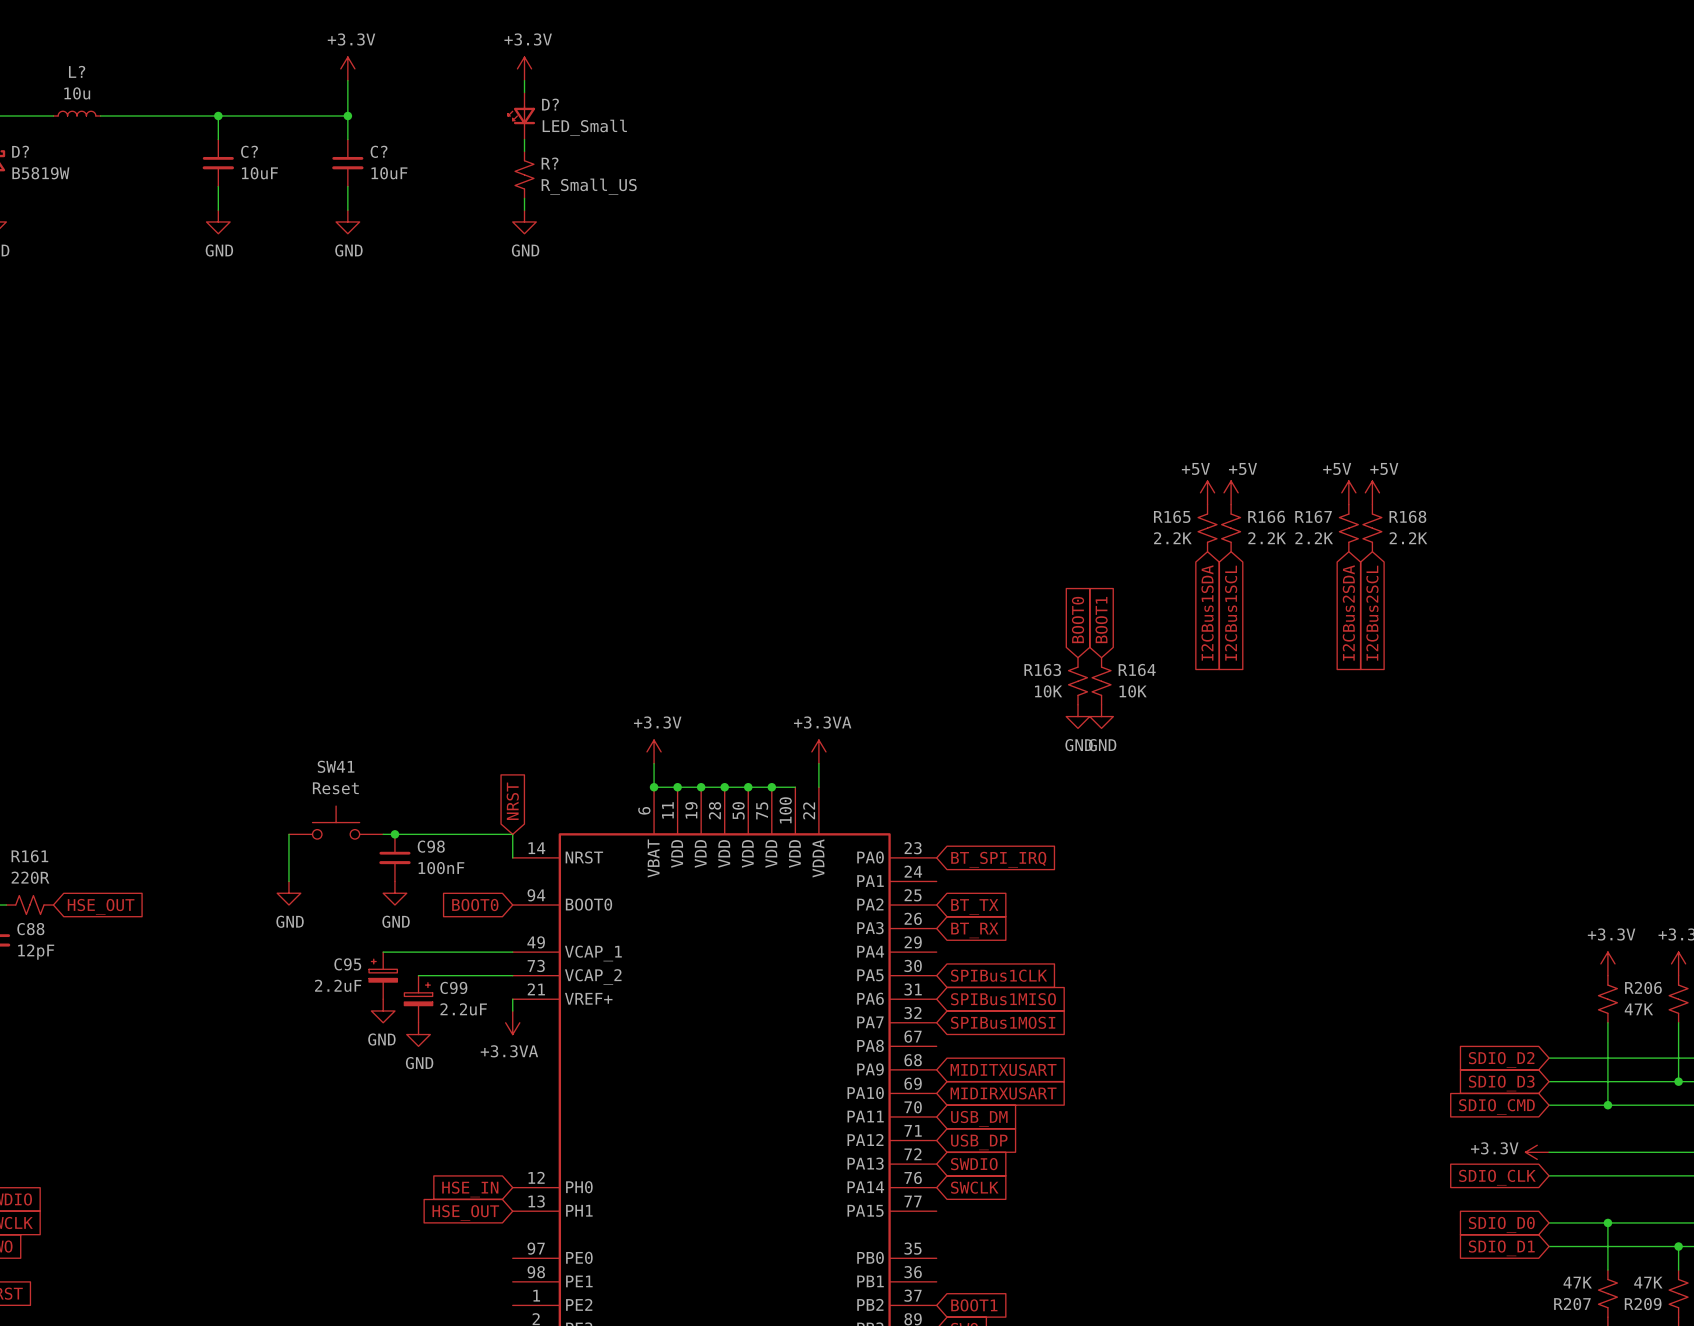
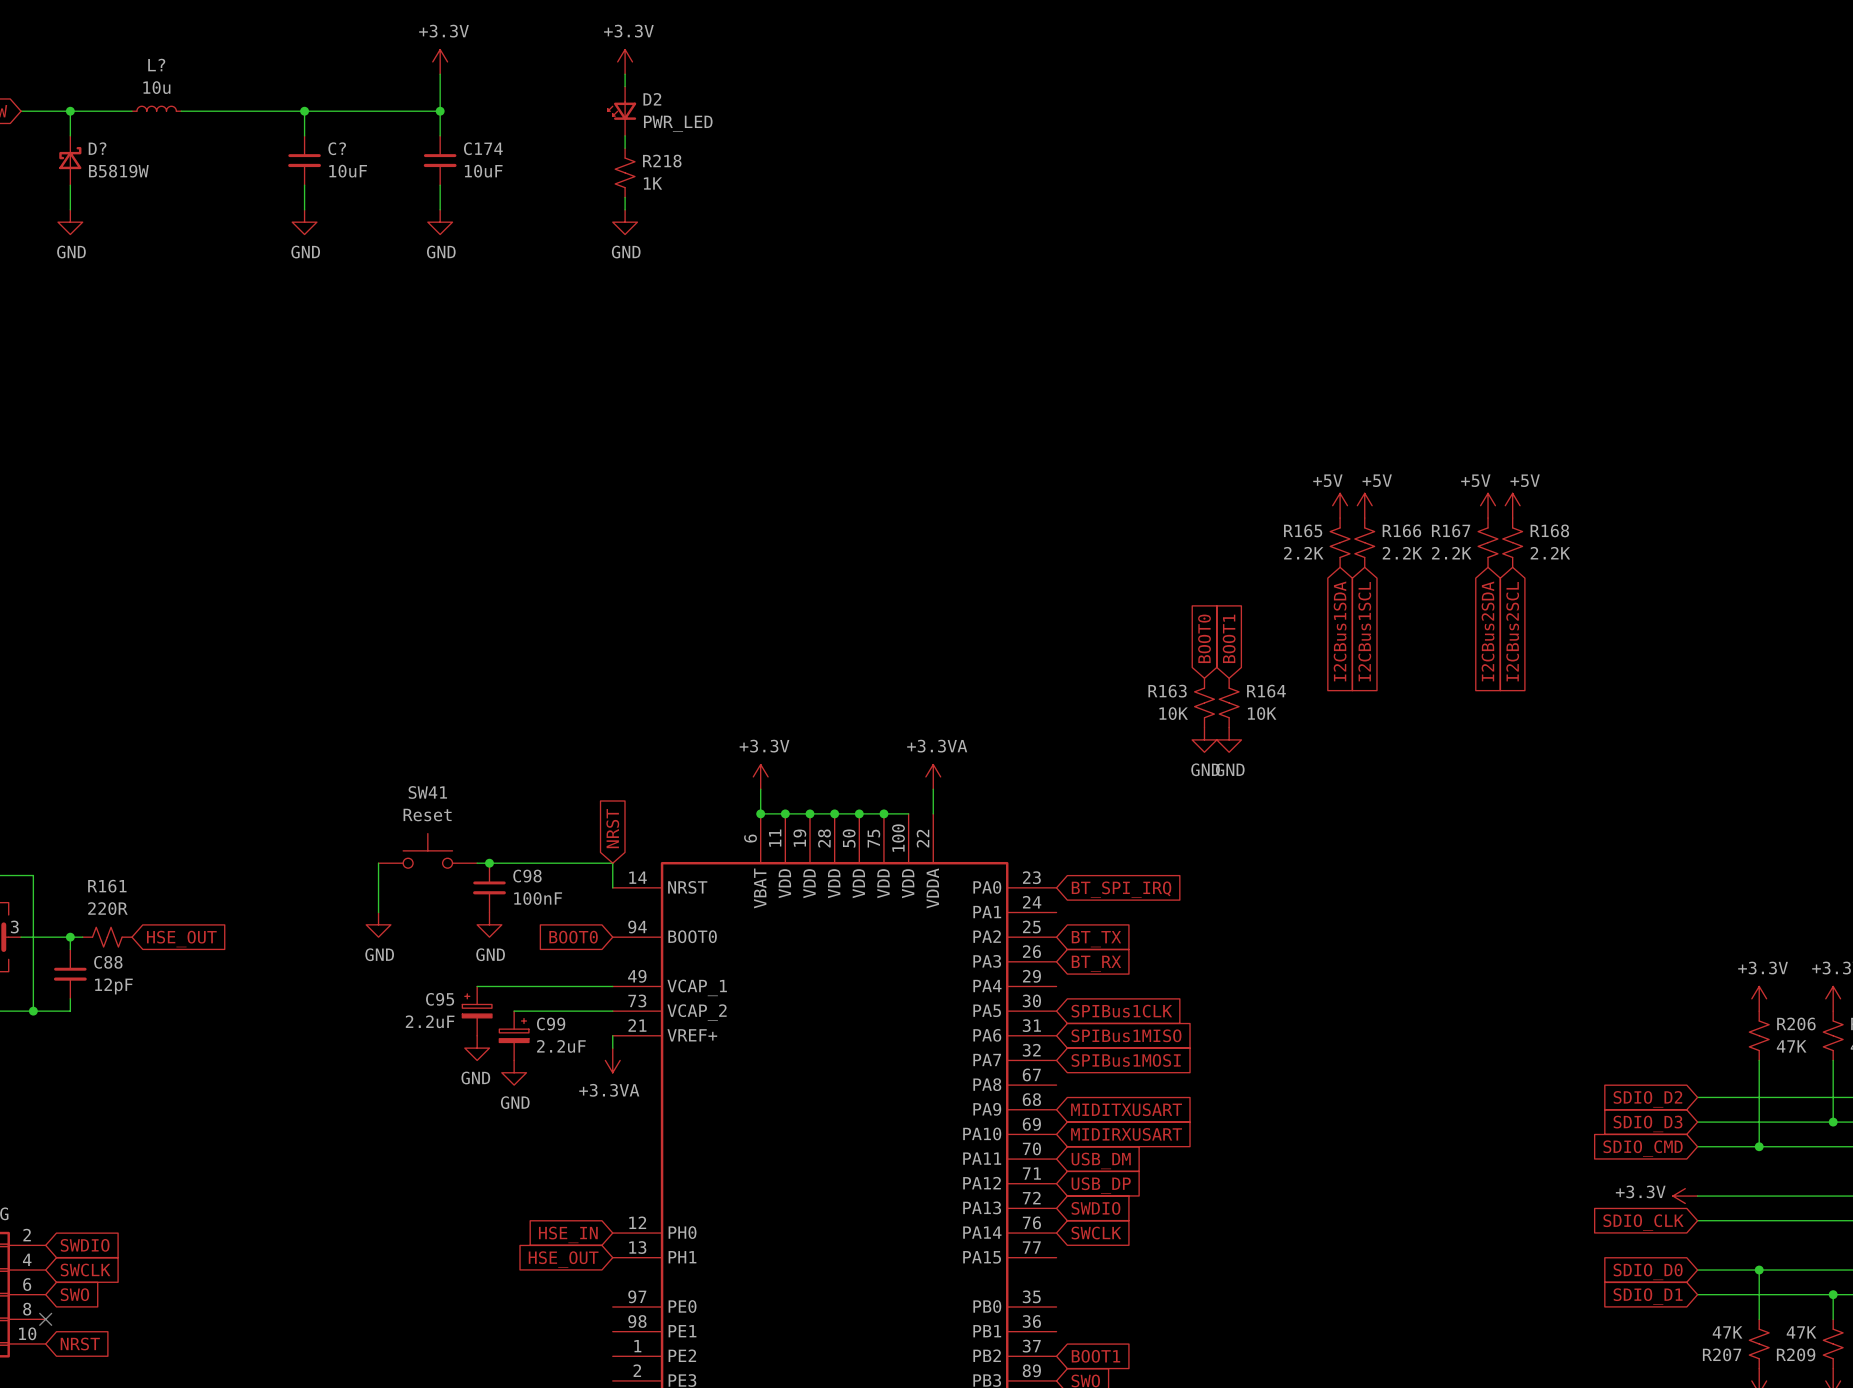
D? name: D? (550, 104) -> D2 (652, 99)
D? value: LED_Small (584, 127) -> PWR_LED (678, 123)
C? name: C? (379, 151) -> C174 (483, 148)
R? name: R? (550, 163) -> R218 (662, 161)
R? value: R_Small_US (589, 186) -> 1K (653, 183)

